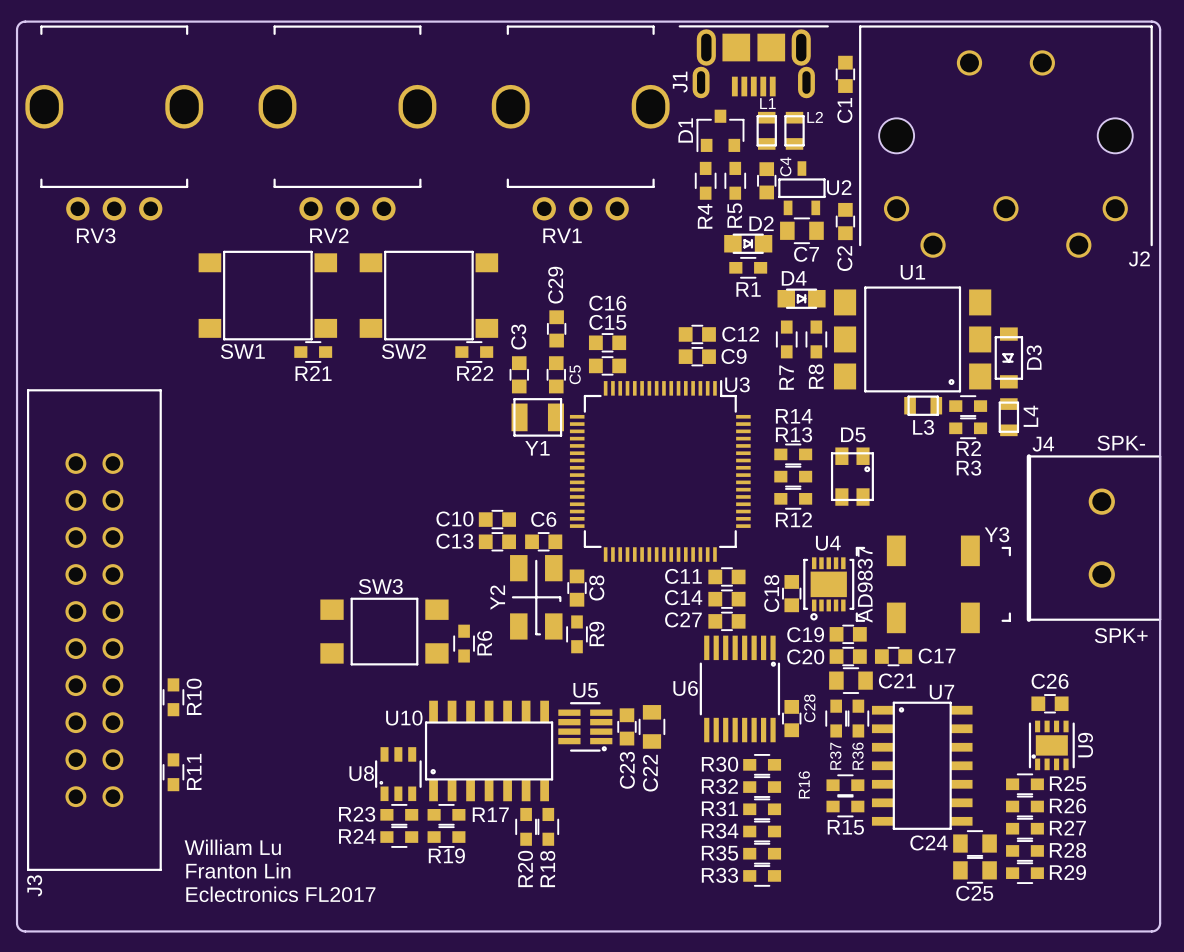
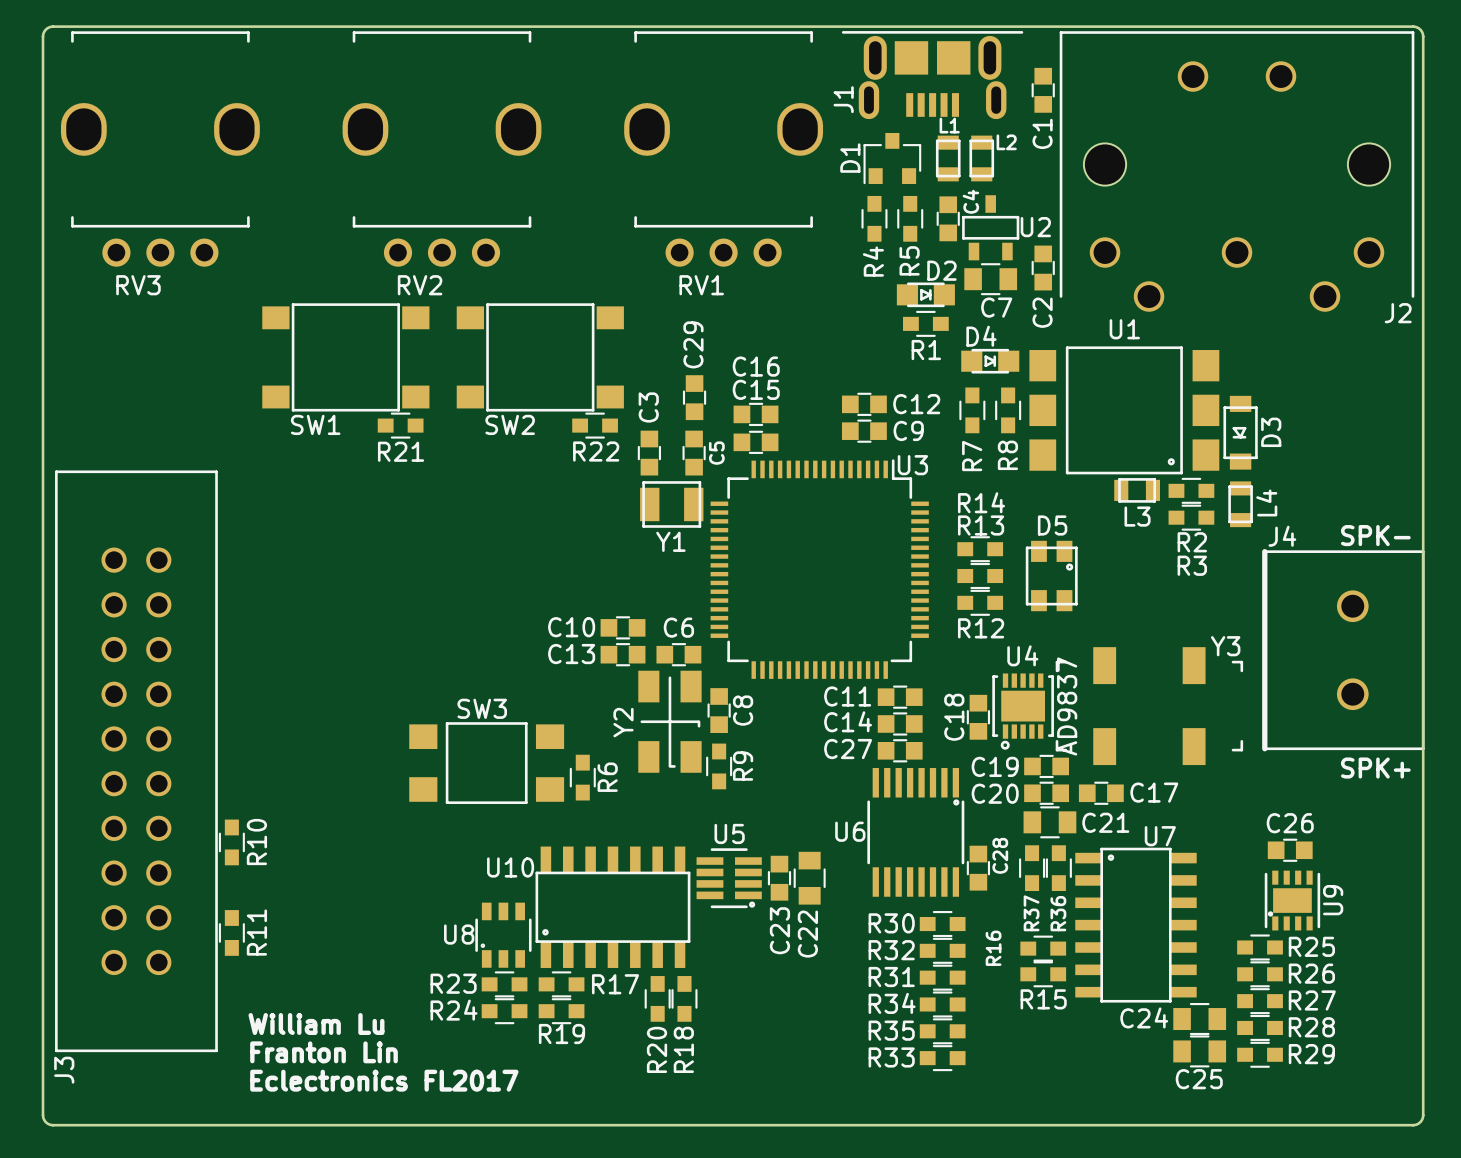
RV3 footprint: [25, 25, 204, 221] -> [60, 31, 260, 267]
RV2 footprint: [258, 25, 437, 221] -> [342, 31, 542, 267]
RV1 footprint: [491, 25, 670, 221] -> [624, 31, 824, 267]

